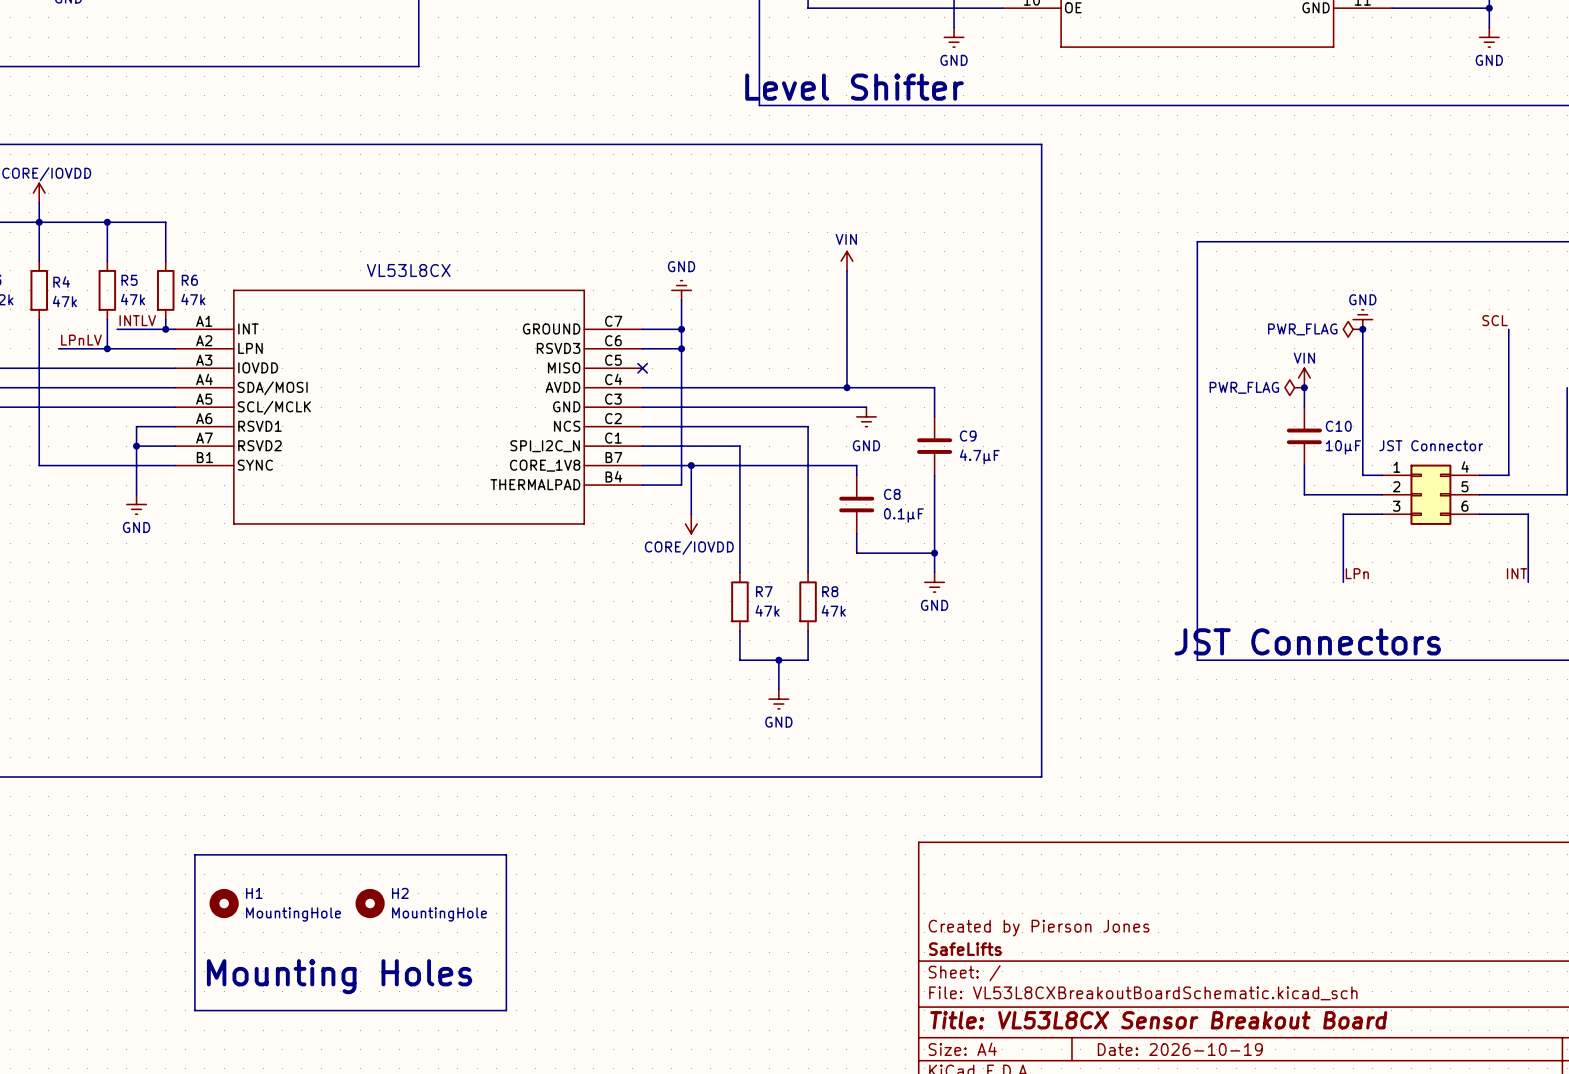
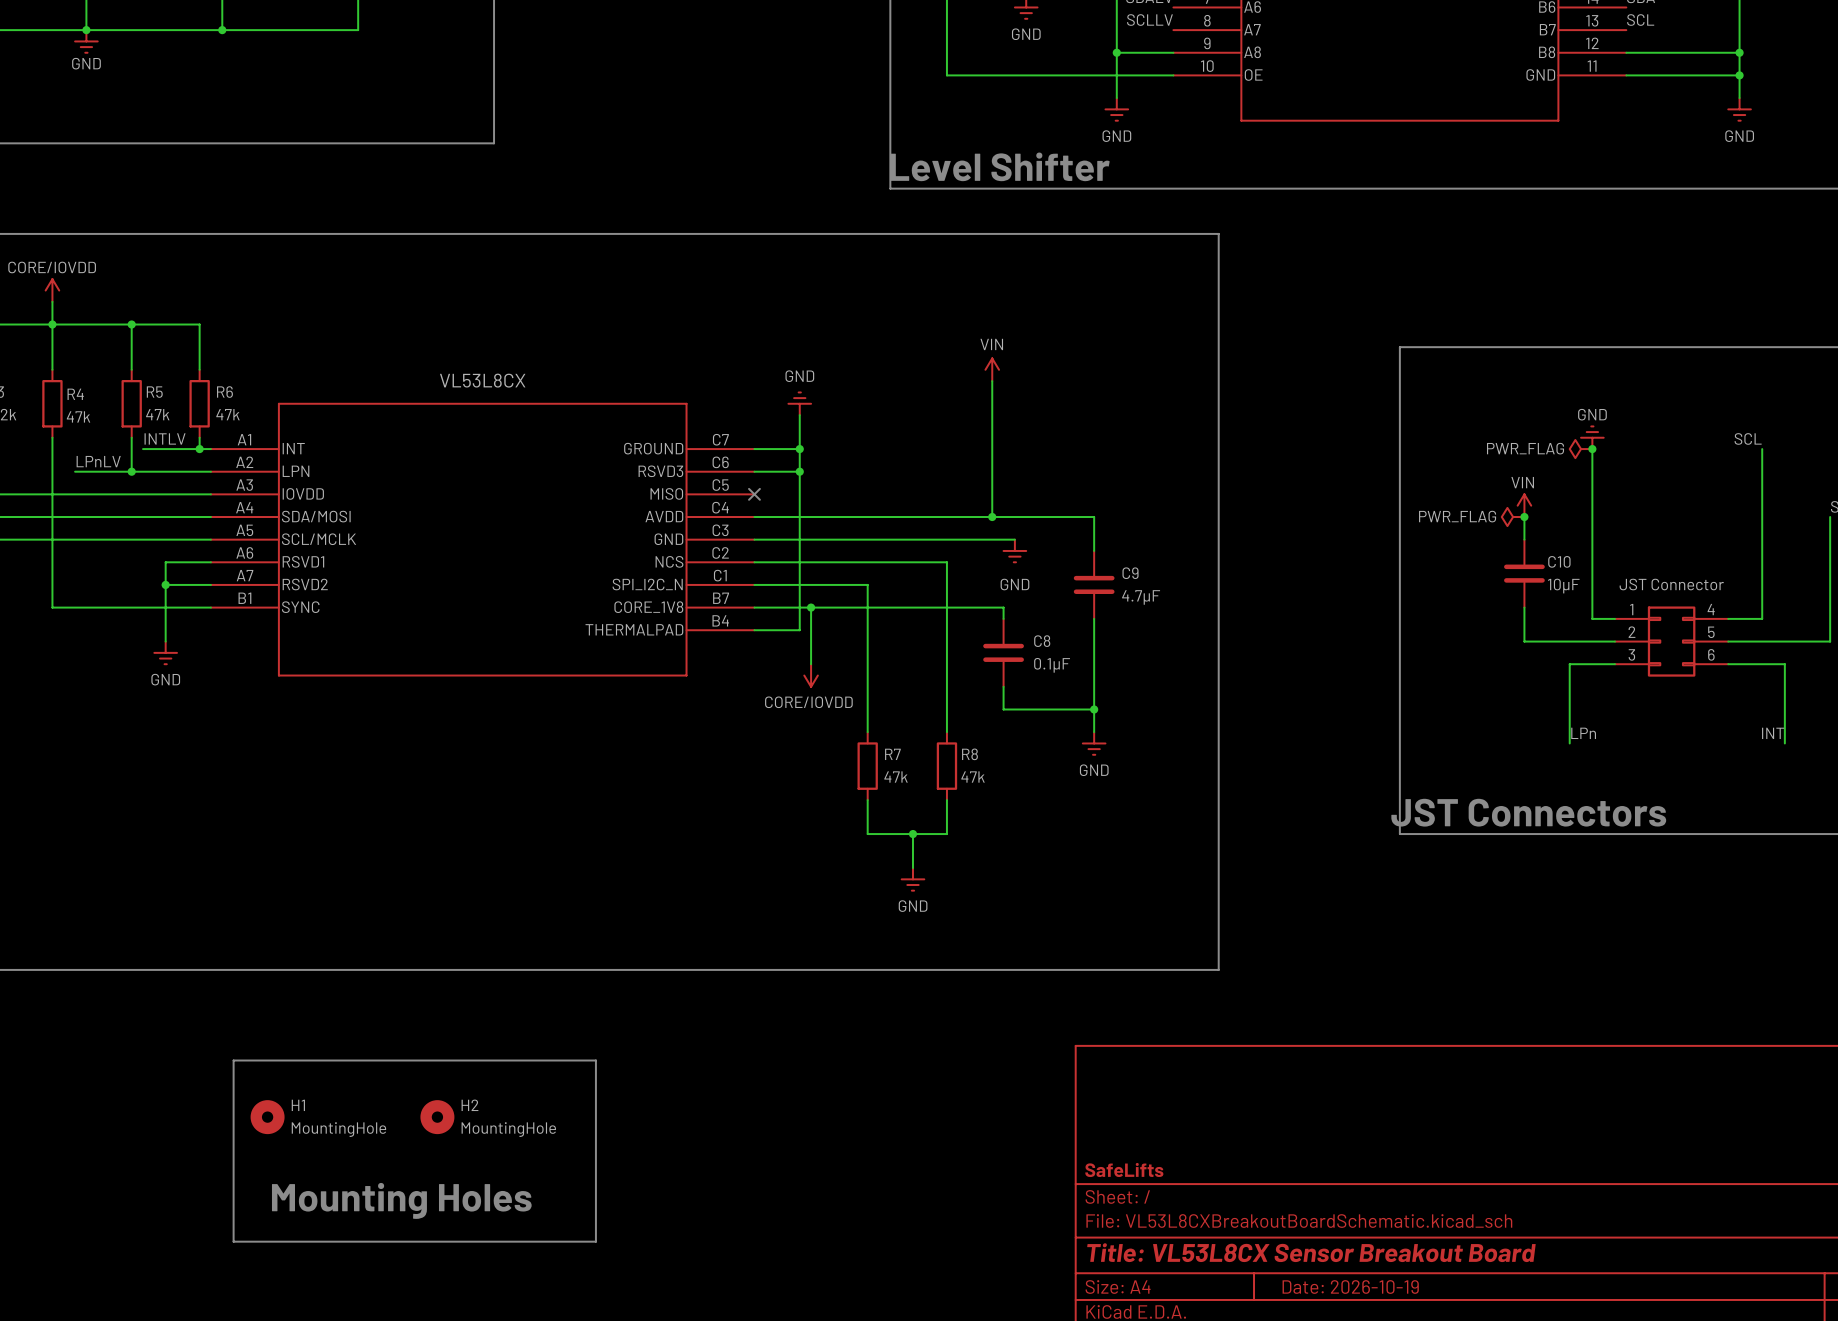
title block: Created by Pierson Jones (1039, 928) -> none

